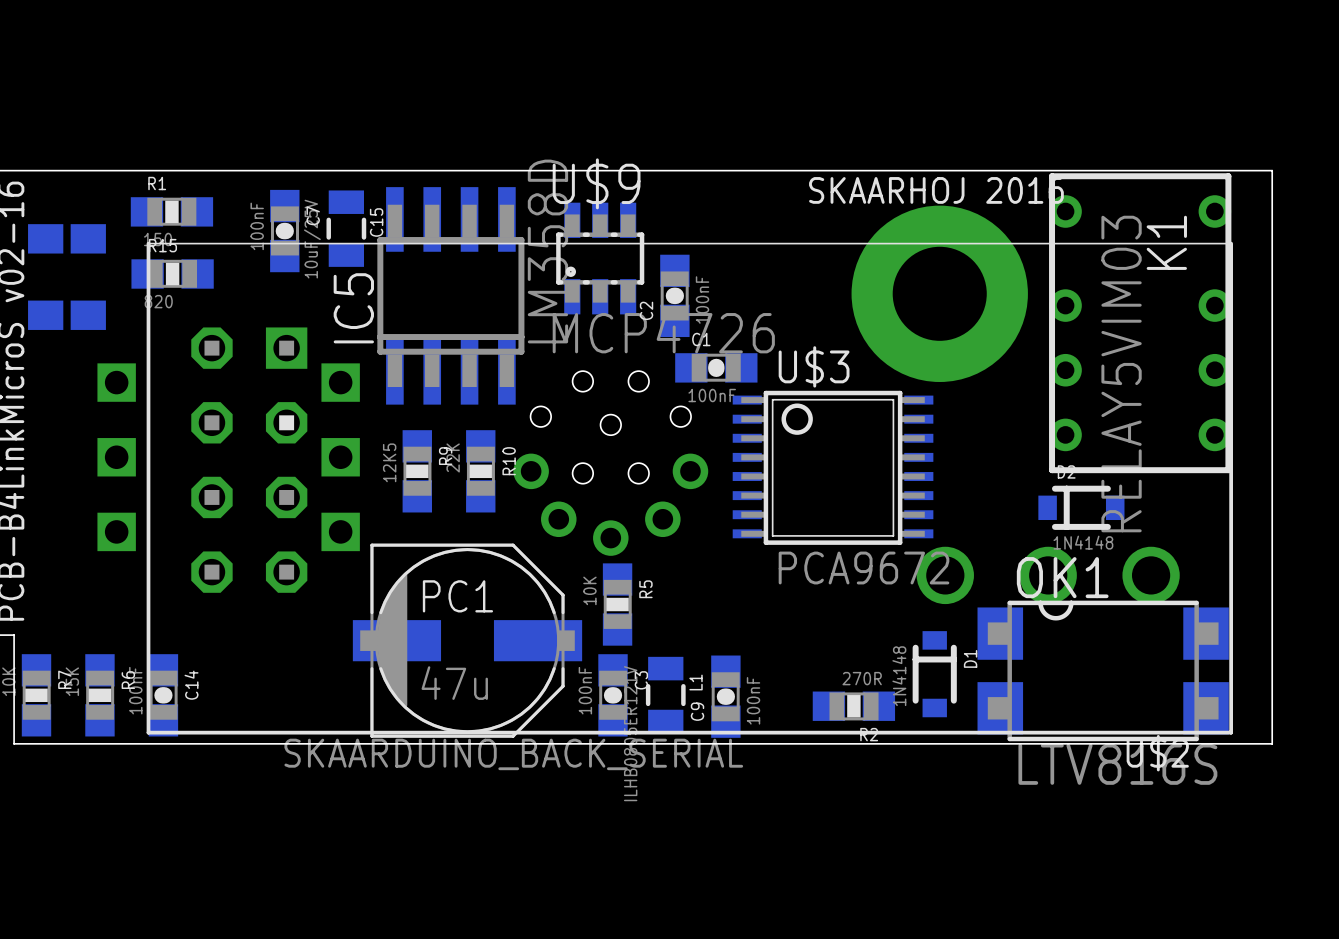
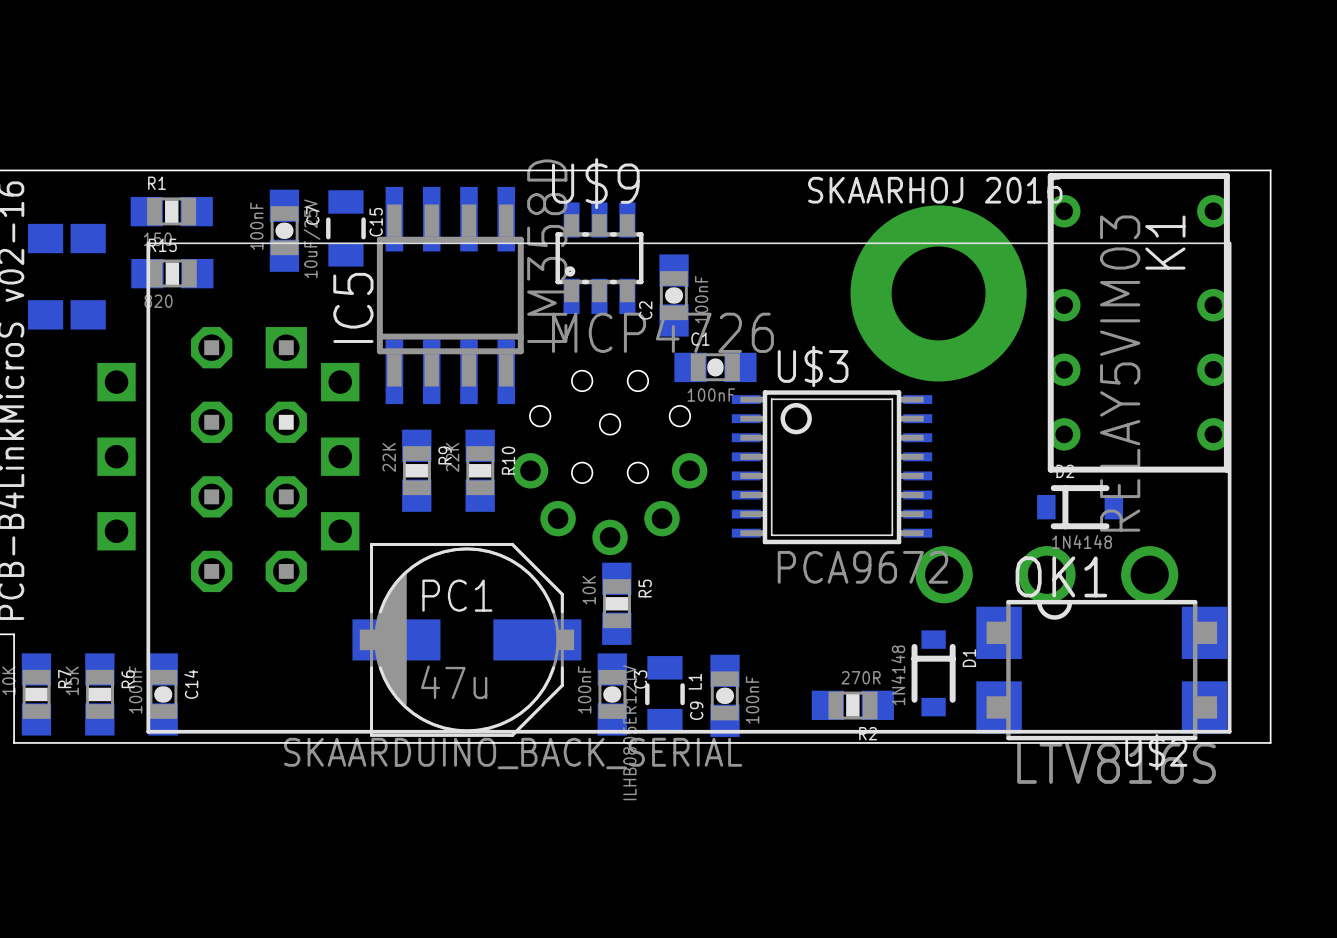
R9 value: 12K5 (389, 462) -> 22K (389, 457)

